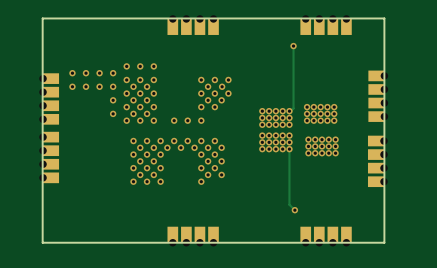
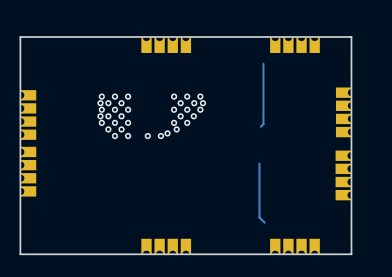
via: (293, 46) -> none
via: (126, 66) -> none
via: (140, 66) -> none
via: (153, 66) -> none
via: (72, 73) -> none
via: (86, 73) -> none
via: (99, 73) -> none
via: (113, 73) -> none
via: (72, 86) -> none
via: (86, 86) -> none
via: (99, 86) -> none
via: (113, 86) -> none
via: none -> (100, 103)
via: none -> (202, 103)
via: (113, 100) -> none
via: none -> (100, 116)
via: (307, 107) -> none
via: (313, 107) -> none
via: (320, 107) -> none
via: (327, 107) -> none
via: (334, 107) -> none
via: (262, 111) -> none
via: (269, 111) -> none
via: (275, 111) -> none
via: (282, 111) -> none
via: (289, 111) -> none
via: (113, 113) -> none
via: none -> (176, 129)
via: (307, 113) -> none
via: (313, 113) -> none
via: (320, 113) -> none
via: (327, 113) -> none
via: (334, 113) -> none
via: none -> (167, 133)
via: (262, 117) -> none
via: (269, 117) -> none
via: (275, 117) -> none
via: (282, 117) -> none
via: (289, 117) -> none
via: (126, 120) -> none
via: (201, 120) -> none
via: (307, 120) -> none
via: (313, 120) -> none
via: (320, 120) -> none
via: (327, 120) -> none
via: (334, 120) -> none
via: (262, 124) -> none
via: (269, 124) -> none
via: (275, 124) -> none
via: (282, 124) -> none
via: (289, 124) -> none
via: (262, 135) -> none
via: (269, 135) -> none
via: (275, 135) -> none
via: (282, 135) -> none
via: (289, 135) -> none
via: (308, 139) -> none
via: (315, 139) -> none
via: (322, 139) -> none
via: (328, 139) -> none
via: (335, 139) -> none
via: (133, 141) -> none
via: (147, 141) -> none
via: (160, 141) -> none
via: (174, 141) -> none
via: (187, 141) -> none
via: (201, 141) -> none
via: (214, 141) -> none
via: (262, 142) -> none
via: (269, 142) -> none
via: (275, 142) -> none
via: (282, 142) -> none
via: (289, 142) -> none
via: (308, 146) -> none
via: (315, 146) -> none
via: (322, 146) -> none
via: (328, 146) -> none
via: (335, 146) -> none
via: (140, 147) -> none
via: (153, 147) -> none
via: (167, 147) -> none
via: (180, 147) -> none
via: (194, 147) -> none
via: (208, 147) -> none
via: (221, 147) -> none
via: (262, 149) -> none
via: (269, 149) -> none
via: (275, 149) -> none
via: (282, 149) -> none
via: (289, 149) -> none
via: (308, 153) -> none
via: (315, 153) -> none
via: (322, 153) -> none
via: (328, 153) -> none
via: (335, 153) -> none
via: (133, 154) -> none
via: (147, 154) -> none
via: (160, 154) -> none
via: (201, 154) -> none
via: (214, 154) -> none
via: (140, 161) -> none
via: (153, 161) -> none
via: (208, 161) -> none
via: (221, 161) -> none
via: (133, 168) -> none
via: (147, 168) -> none
via: (160, 168) -> none
via: (201, 168) -> none
via: (214, 168) -> none
via: (140, 174) -> none
via: (153, 174) -> none
via: (208, 174) -> none
via: (221, 174) -> none
via: (133, 181) -> none
via: (147, 181) -> none
via: (160, 181) -> none
via: (201, 181) -> none
via: (294, 210) -> none

